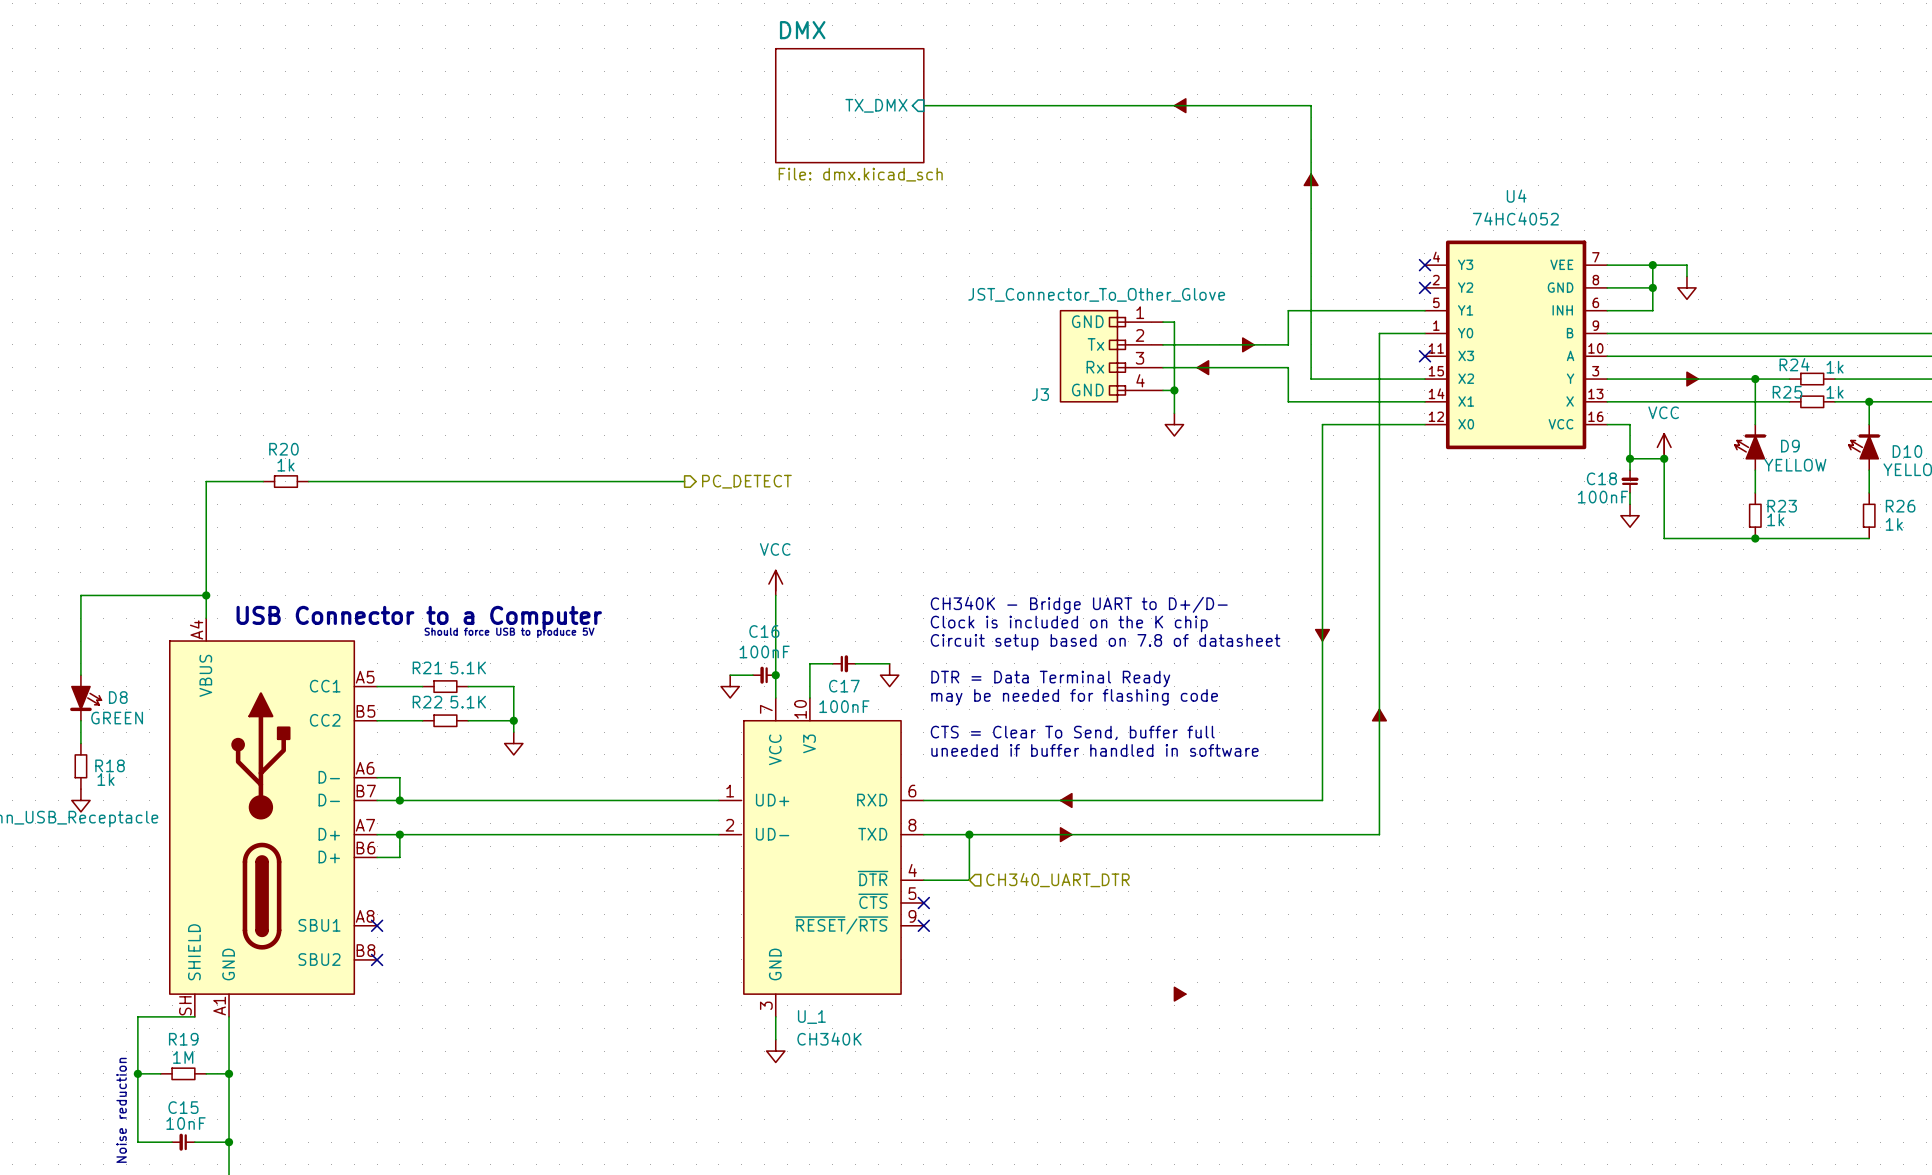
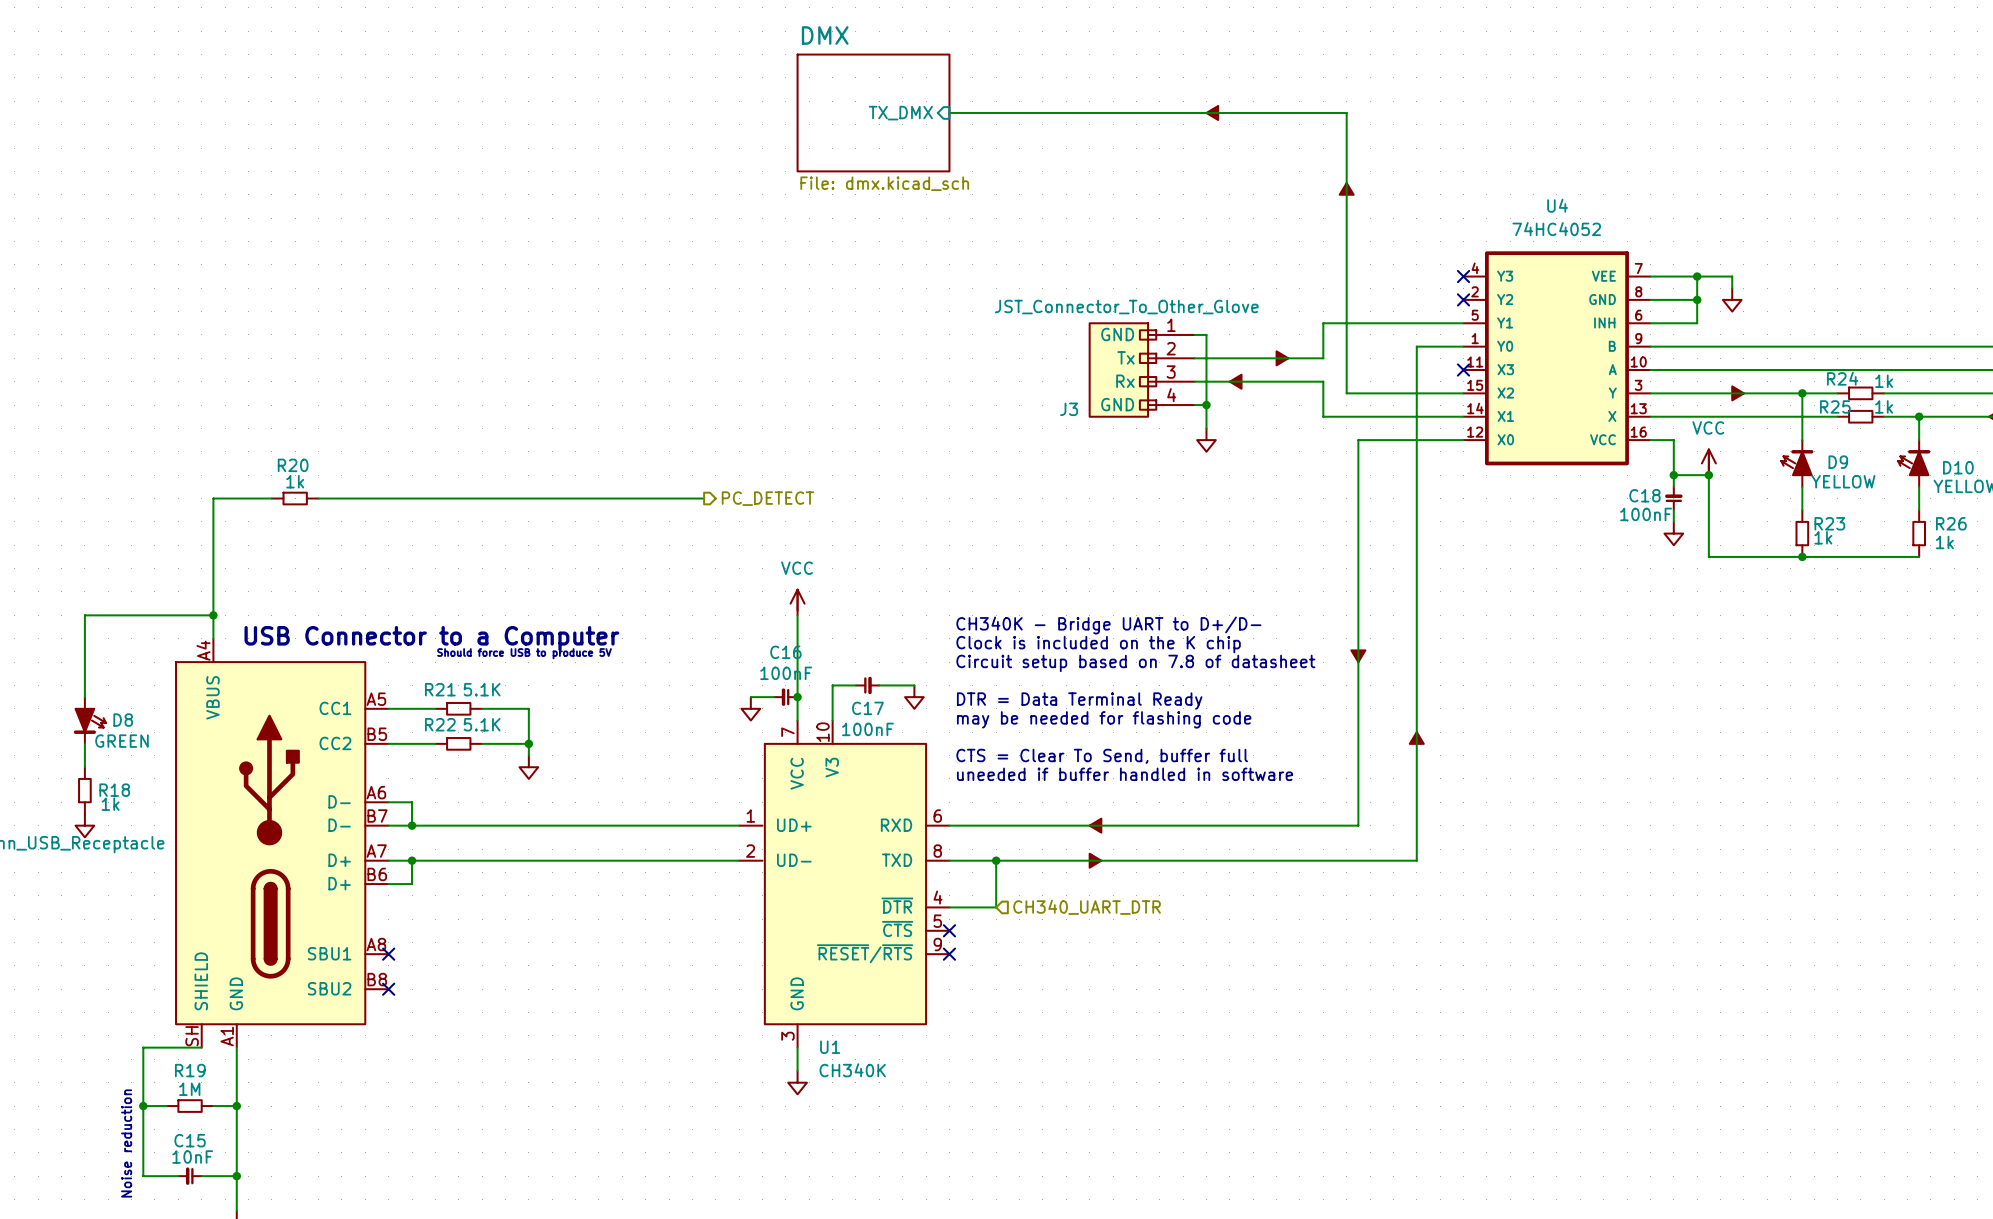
part: (1180, 994) -> none
U_1 name: U_1 (811, 1017) -> U1 (830, 1047)

